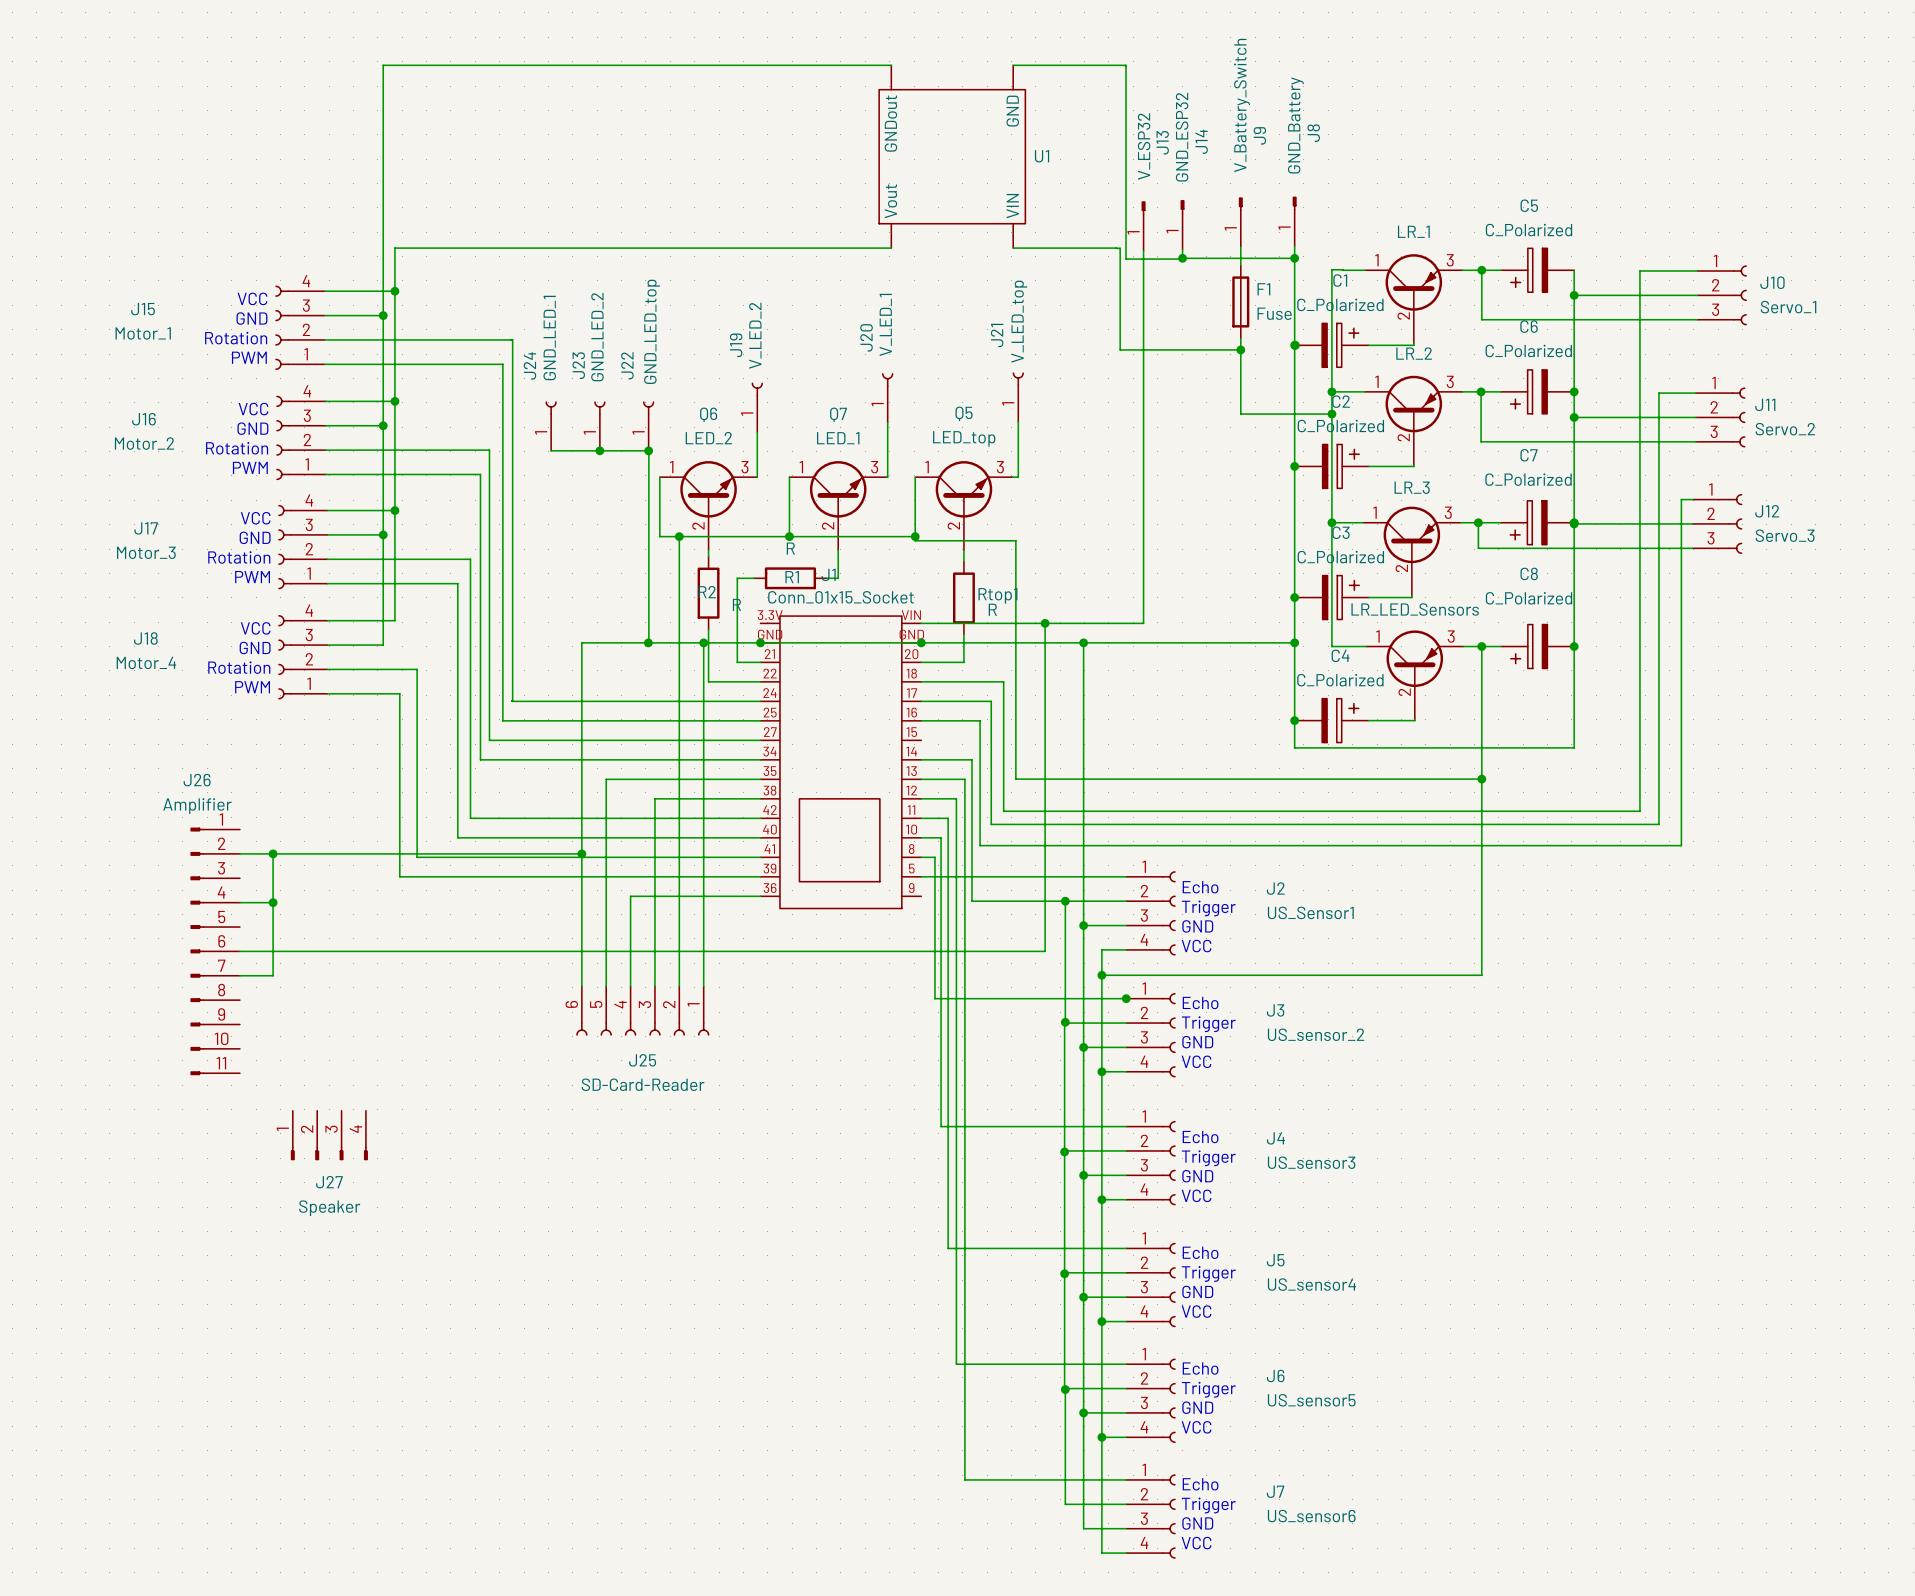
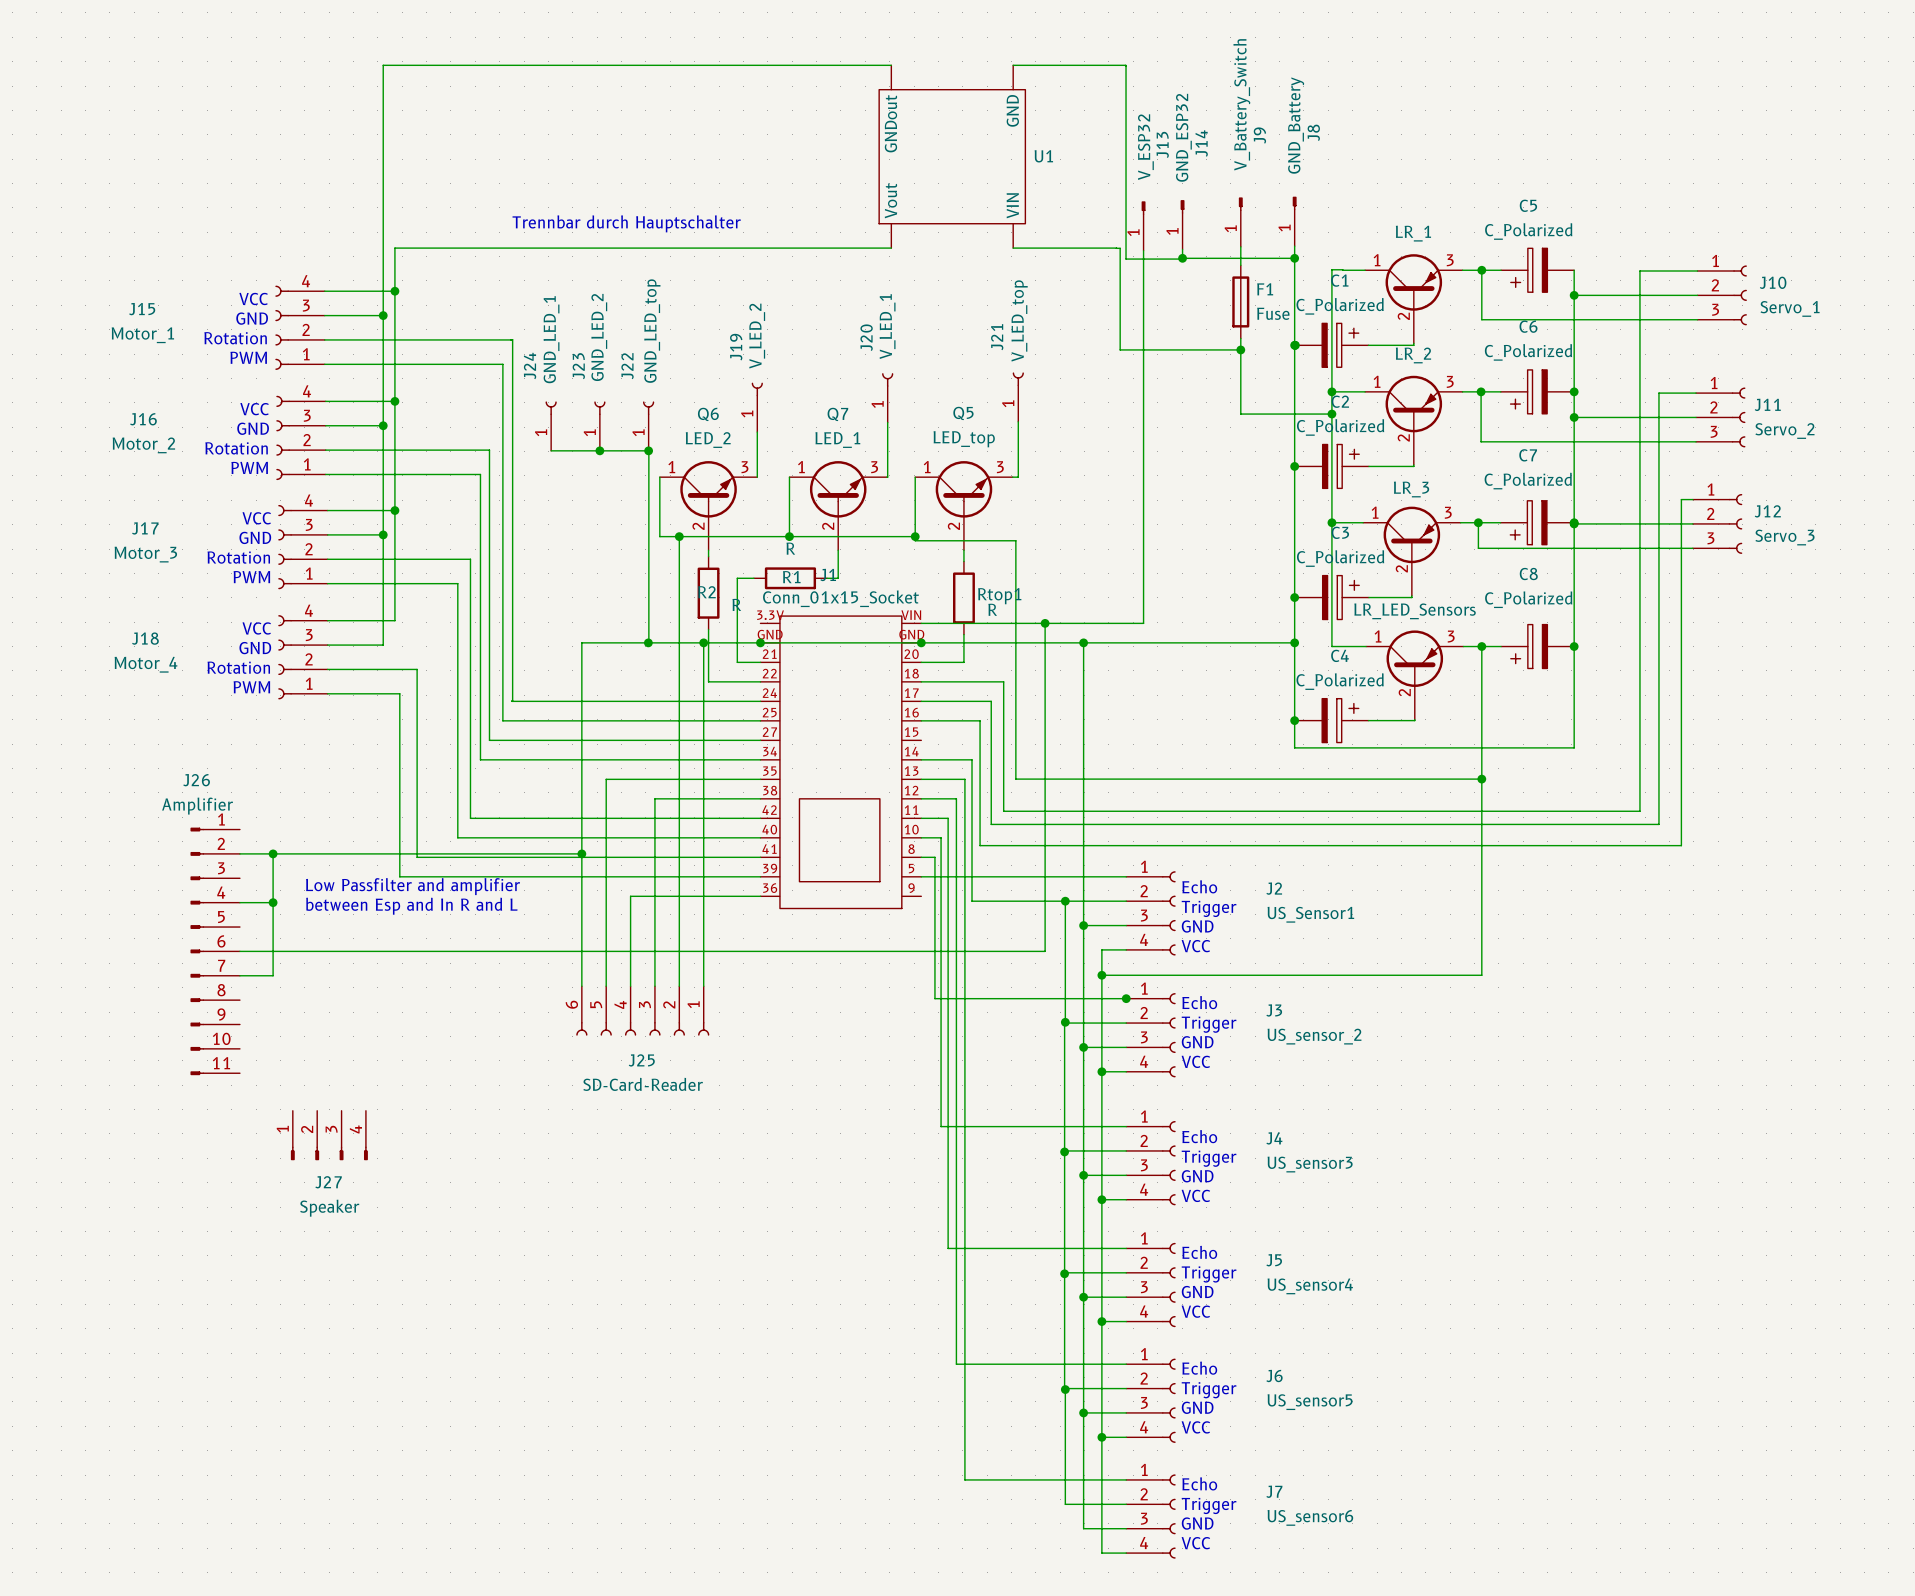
text: none -> Trennbar durch Hauptschalter (626, 223)
text: none -> Low Passfilter and amplifier (413, 886)
text: none -> between Esp and In R and L (411, 906)

